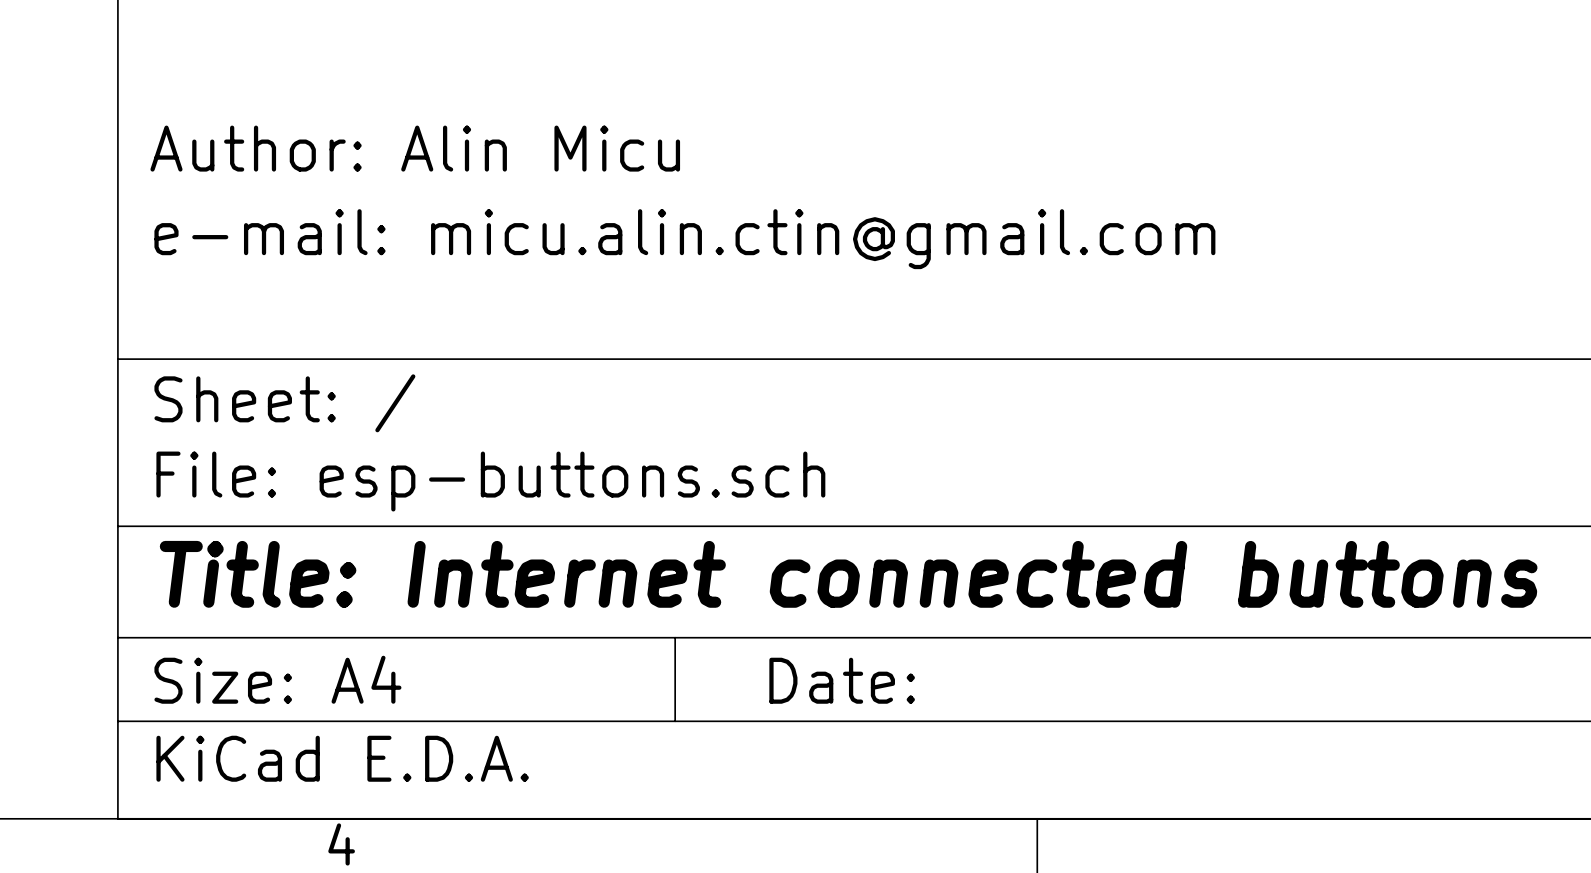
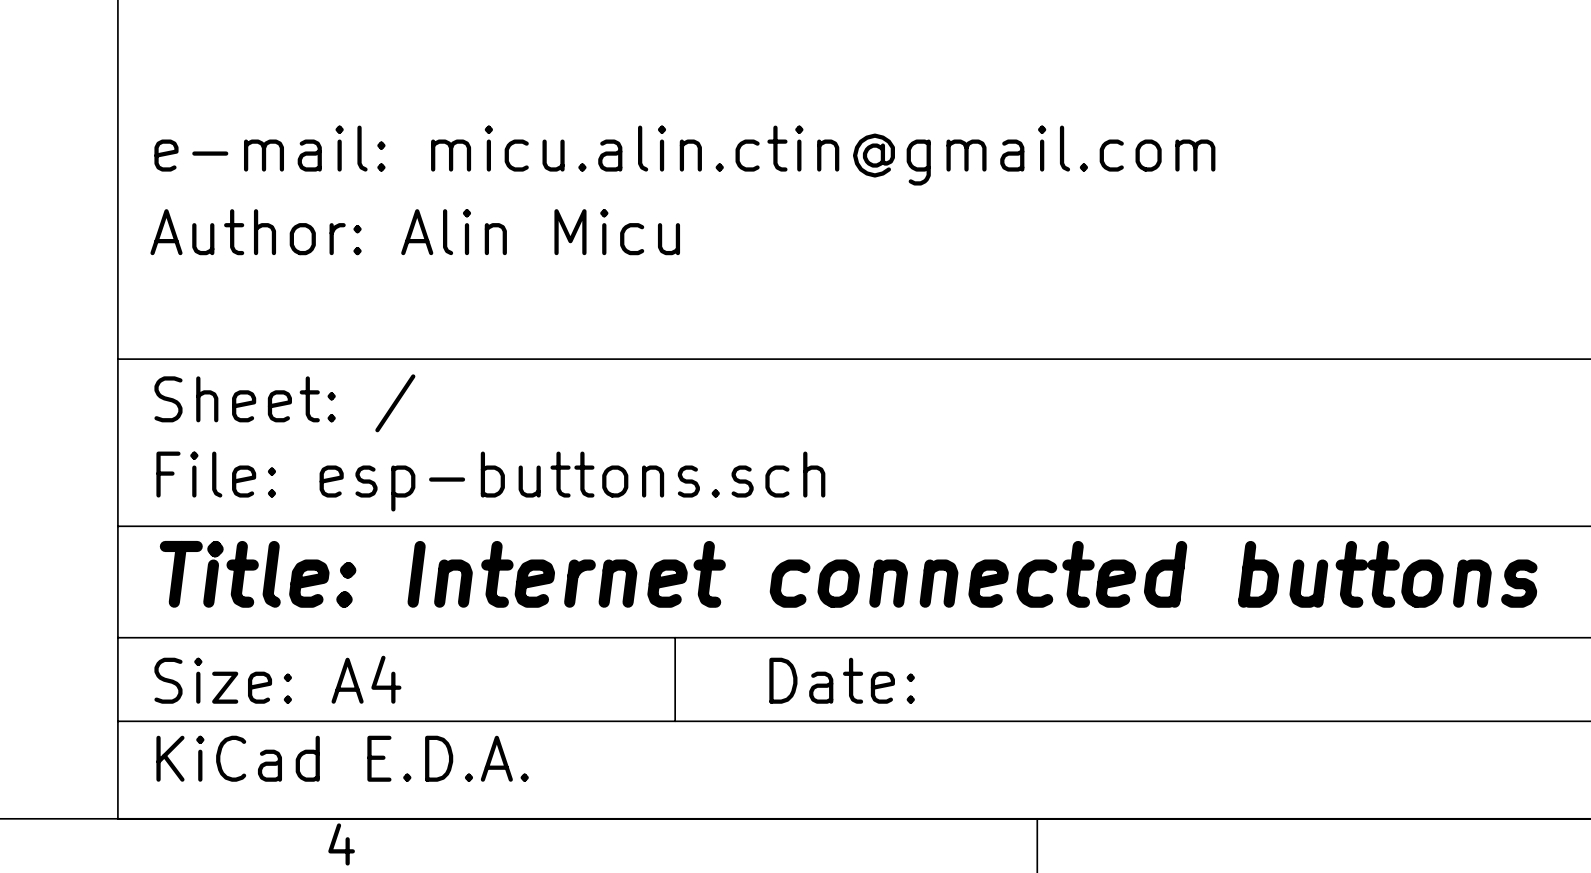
title block: Author: Alin Micu (415, 148) -> e-mail: micu.alin.ctin@gmail.com (684, 155)
title block: e-mail: micu.alin.ctin@gmail.com (684, 239) -> Author: Alin Micu (415, 232)

